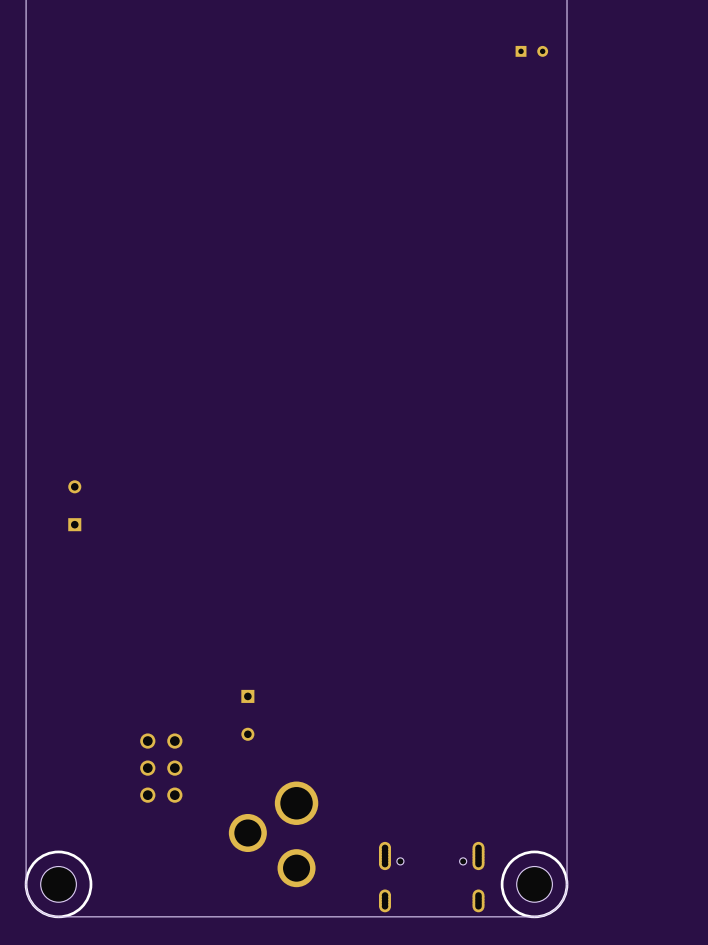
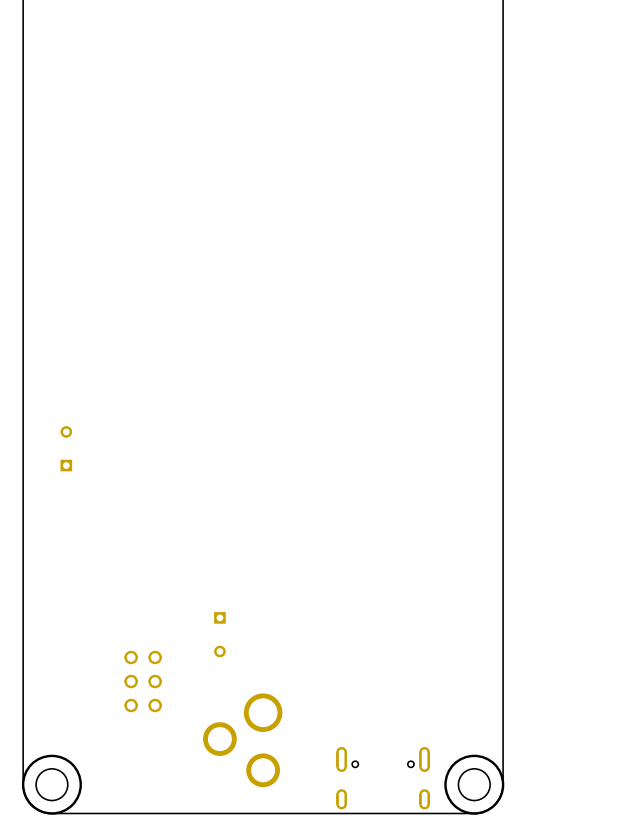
part: (531, 51) -> none

